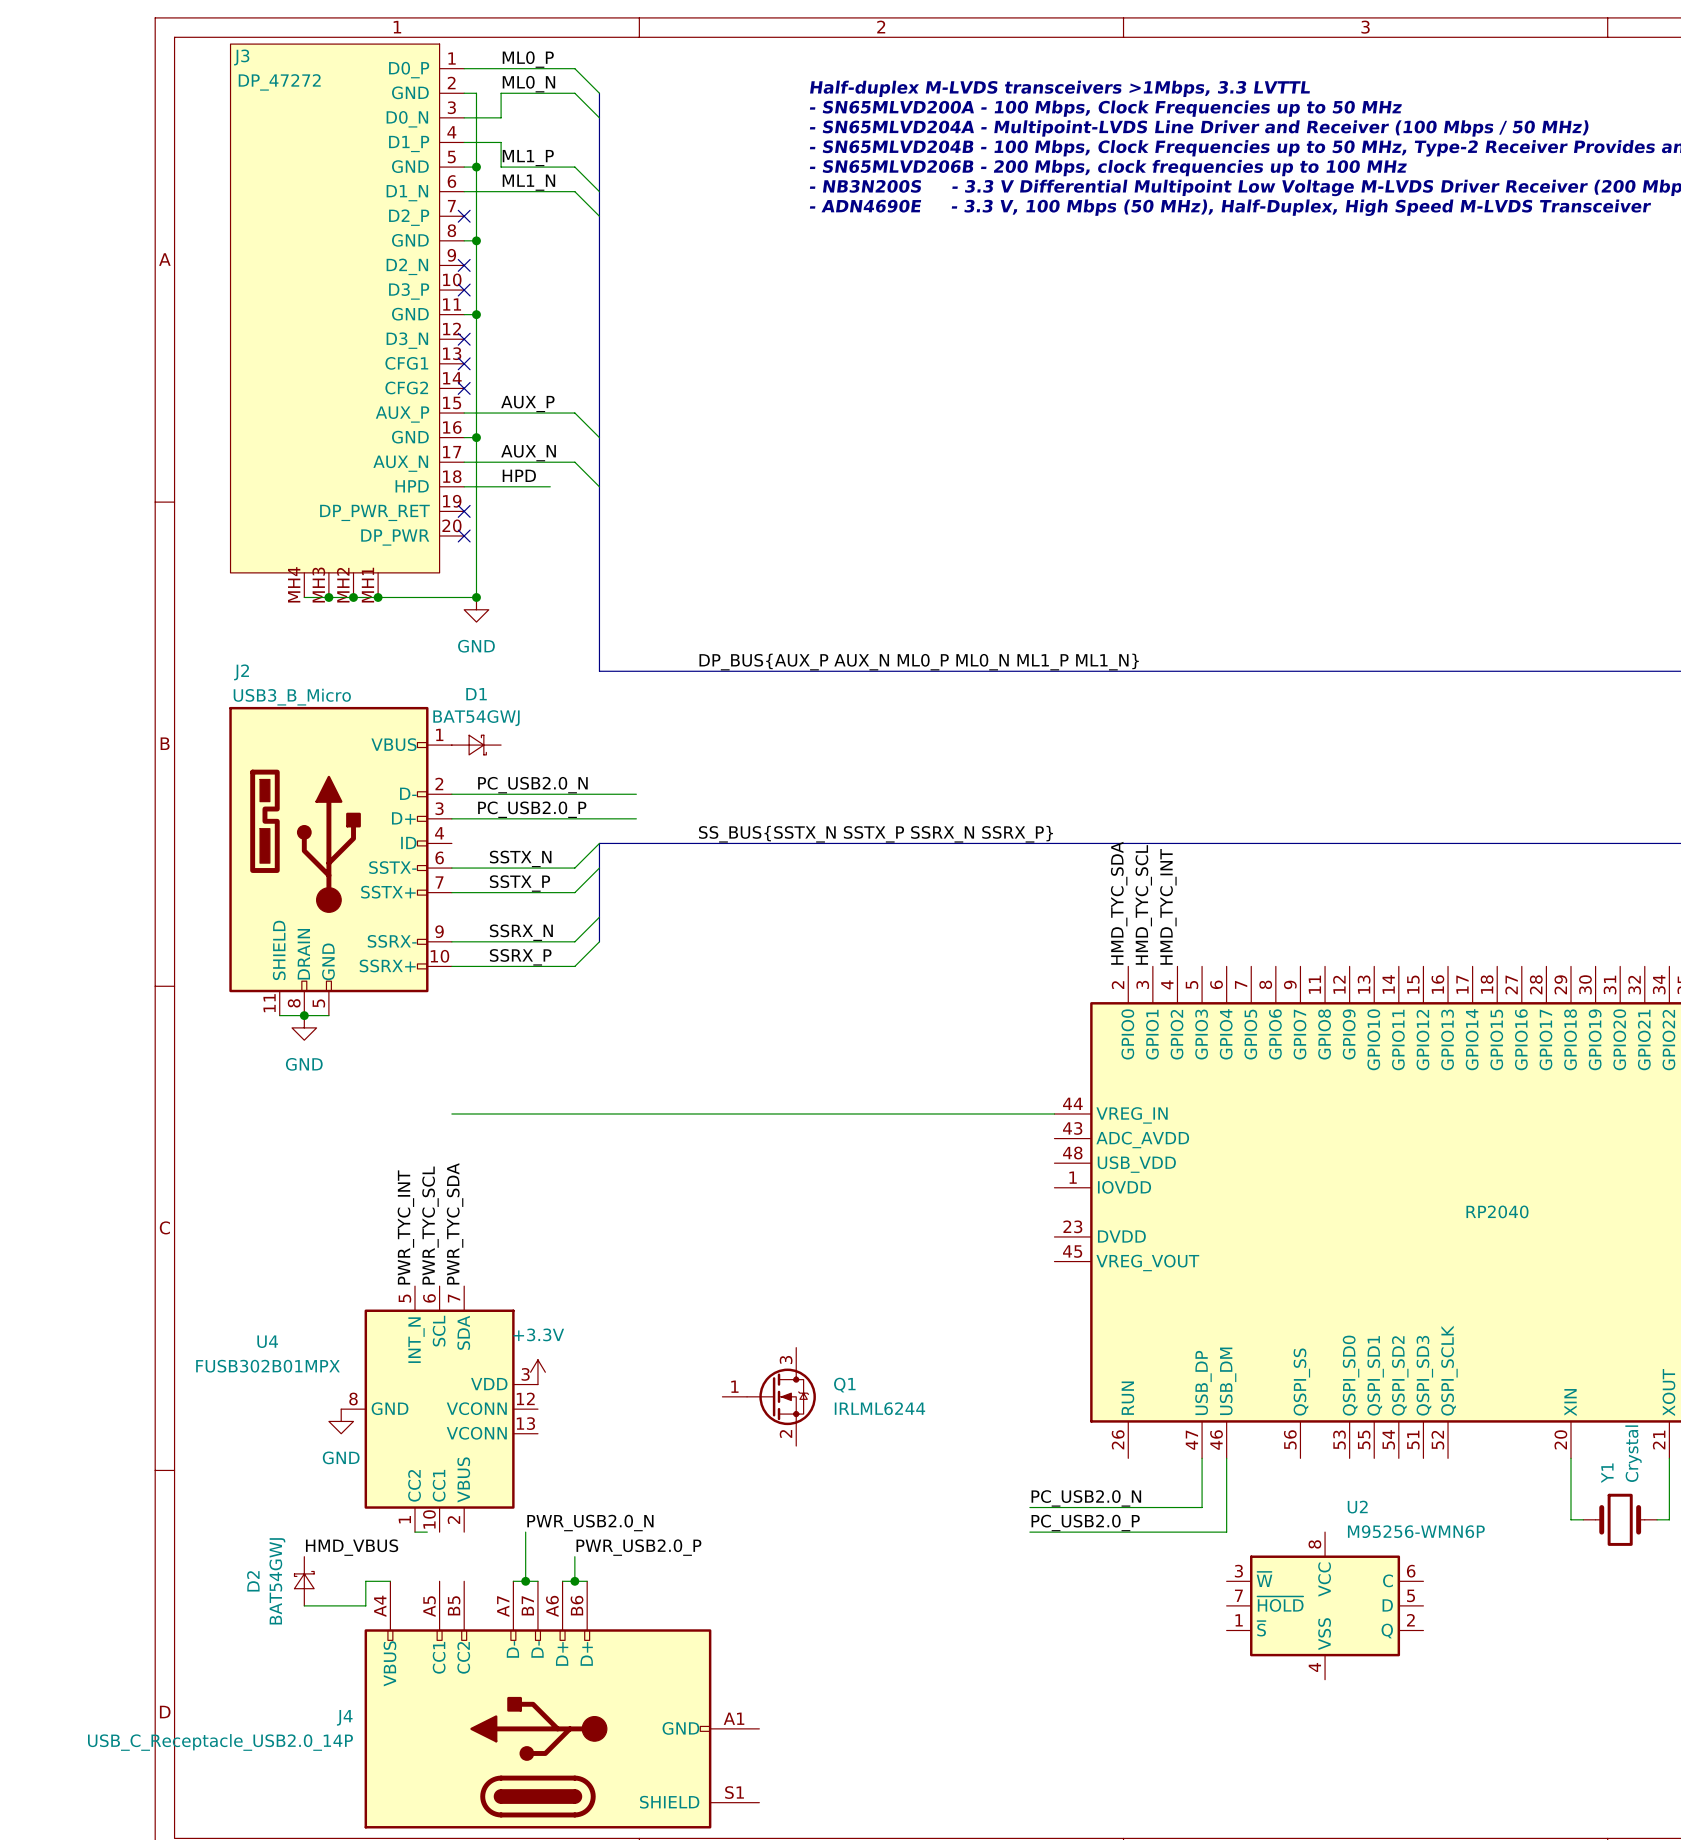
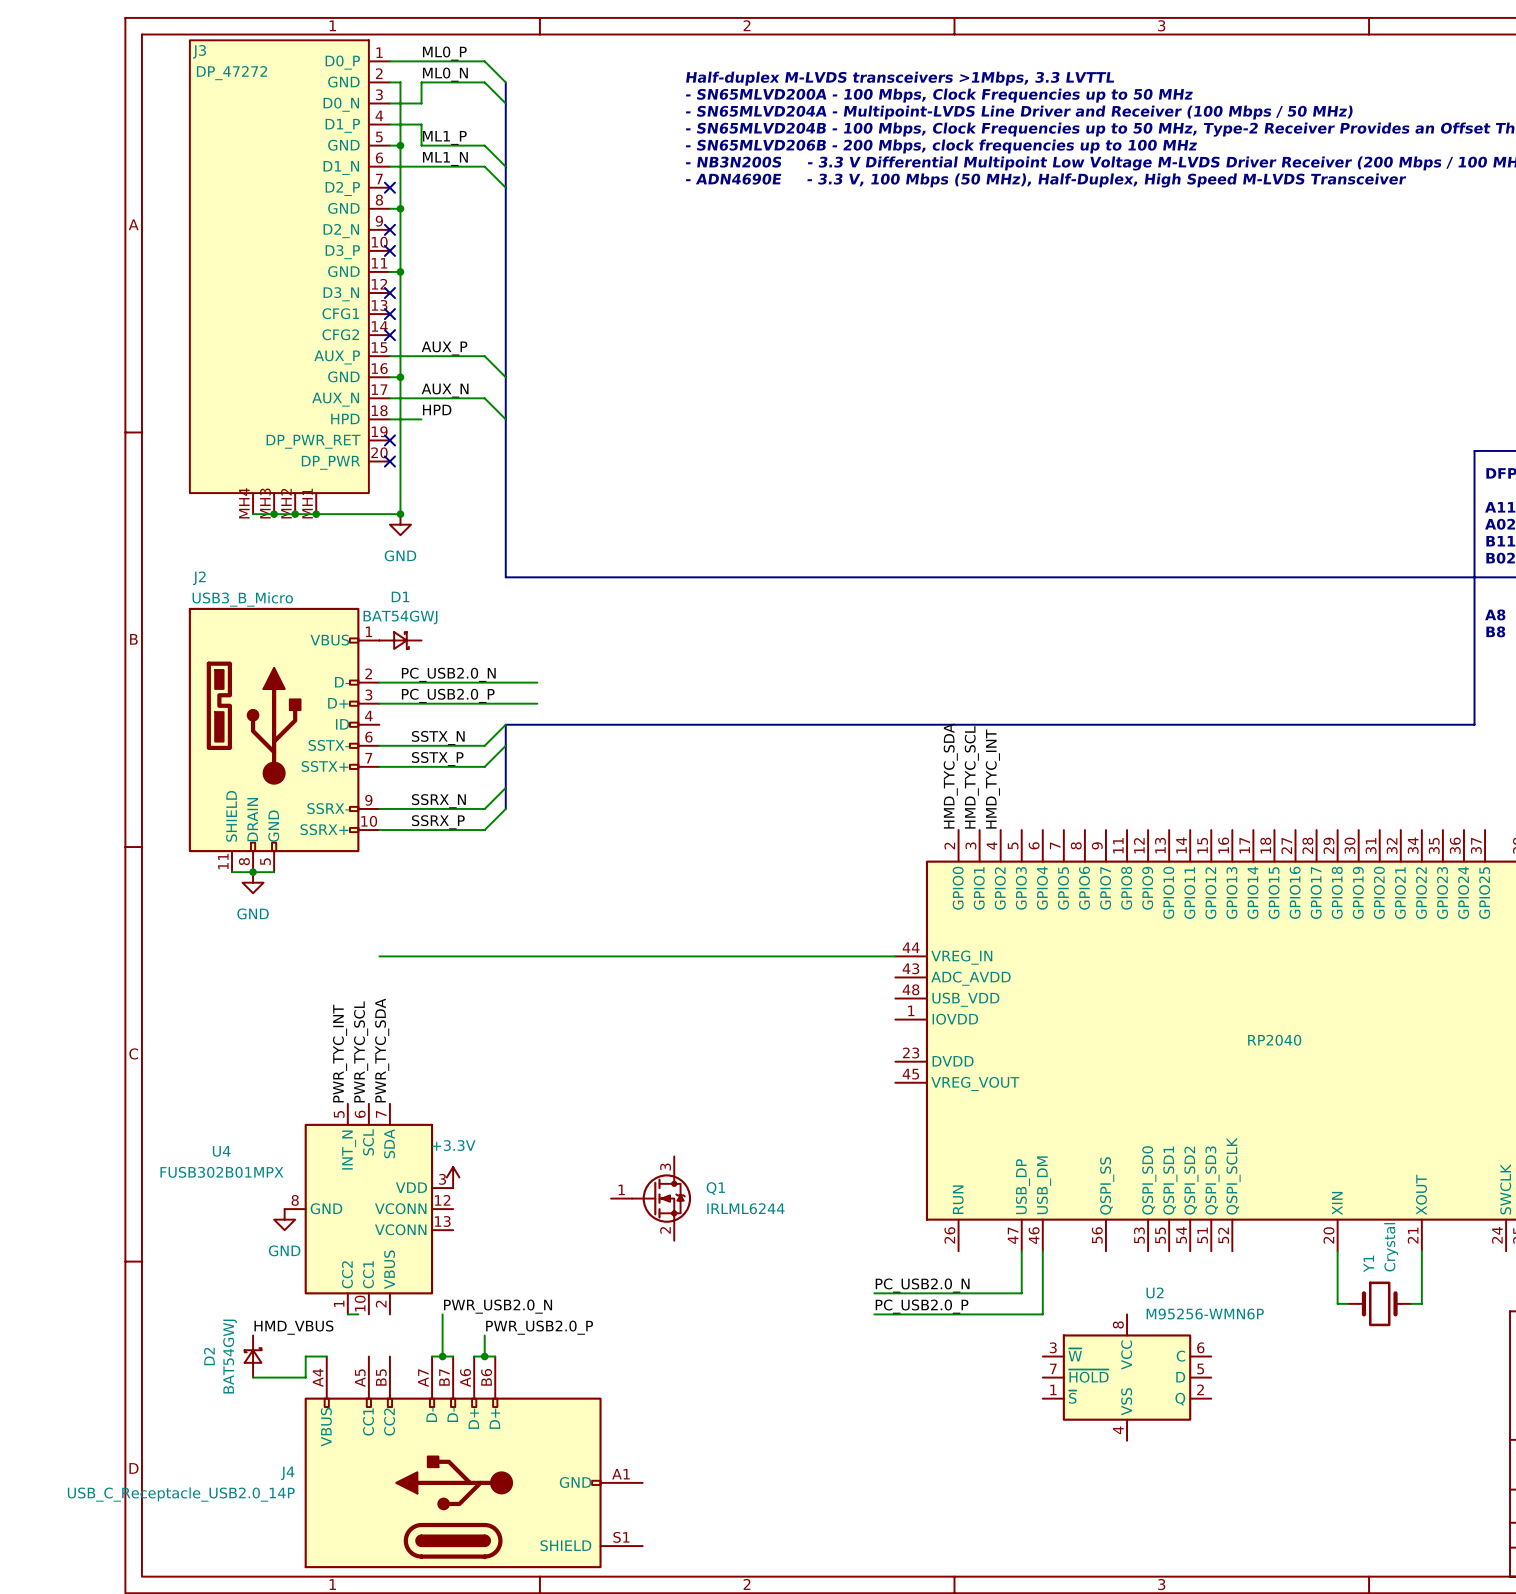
wire: (501, 486) (550, 486) -> none
label: DP_BUS{AUX_P AUX_N ML0_P ML0_N ML1_P ML1_N} (919, 662) -> none
label: SS_BUS{SSTX_N SSTX_P SSRX_N SSRX_P} (875, 834) -> none

